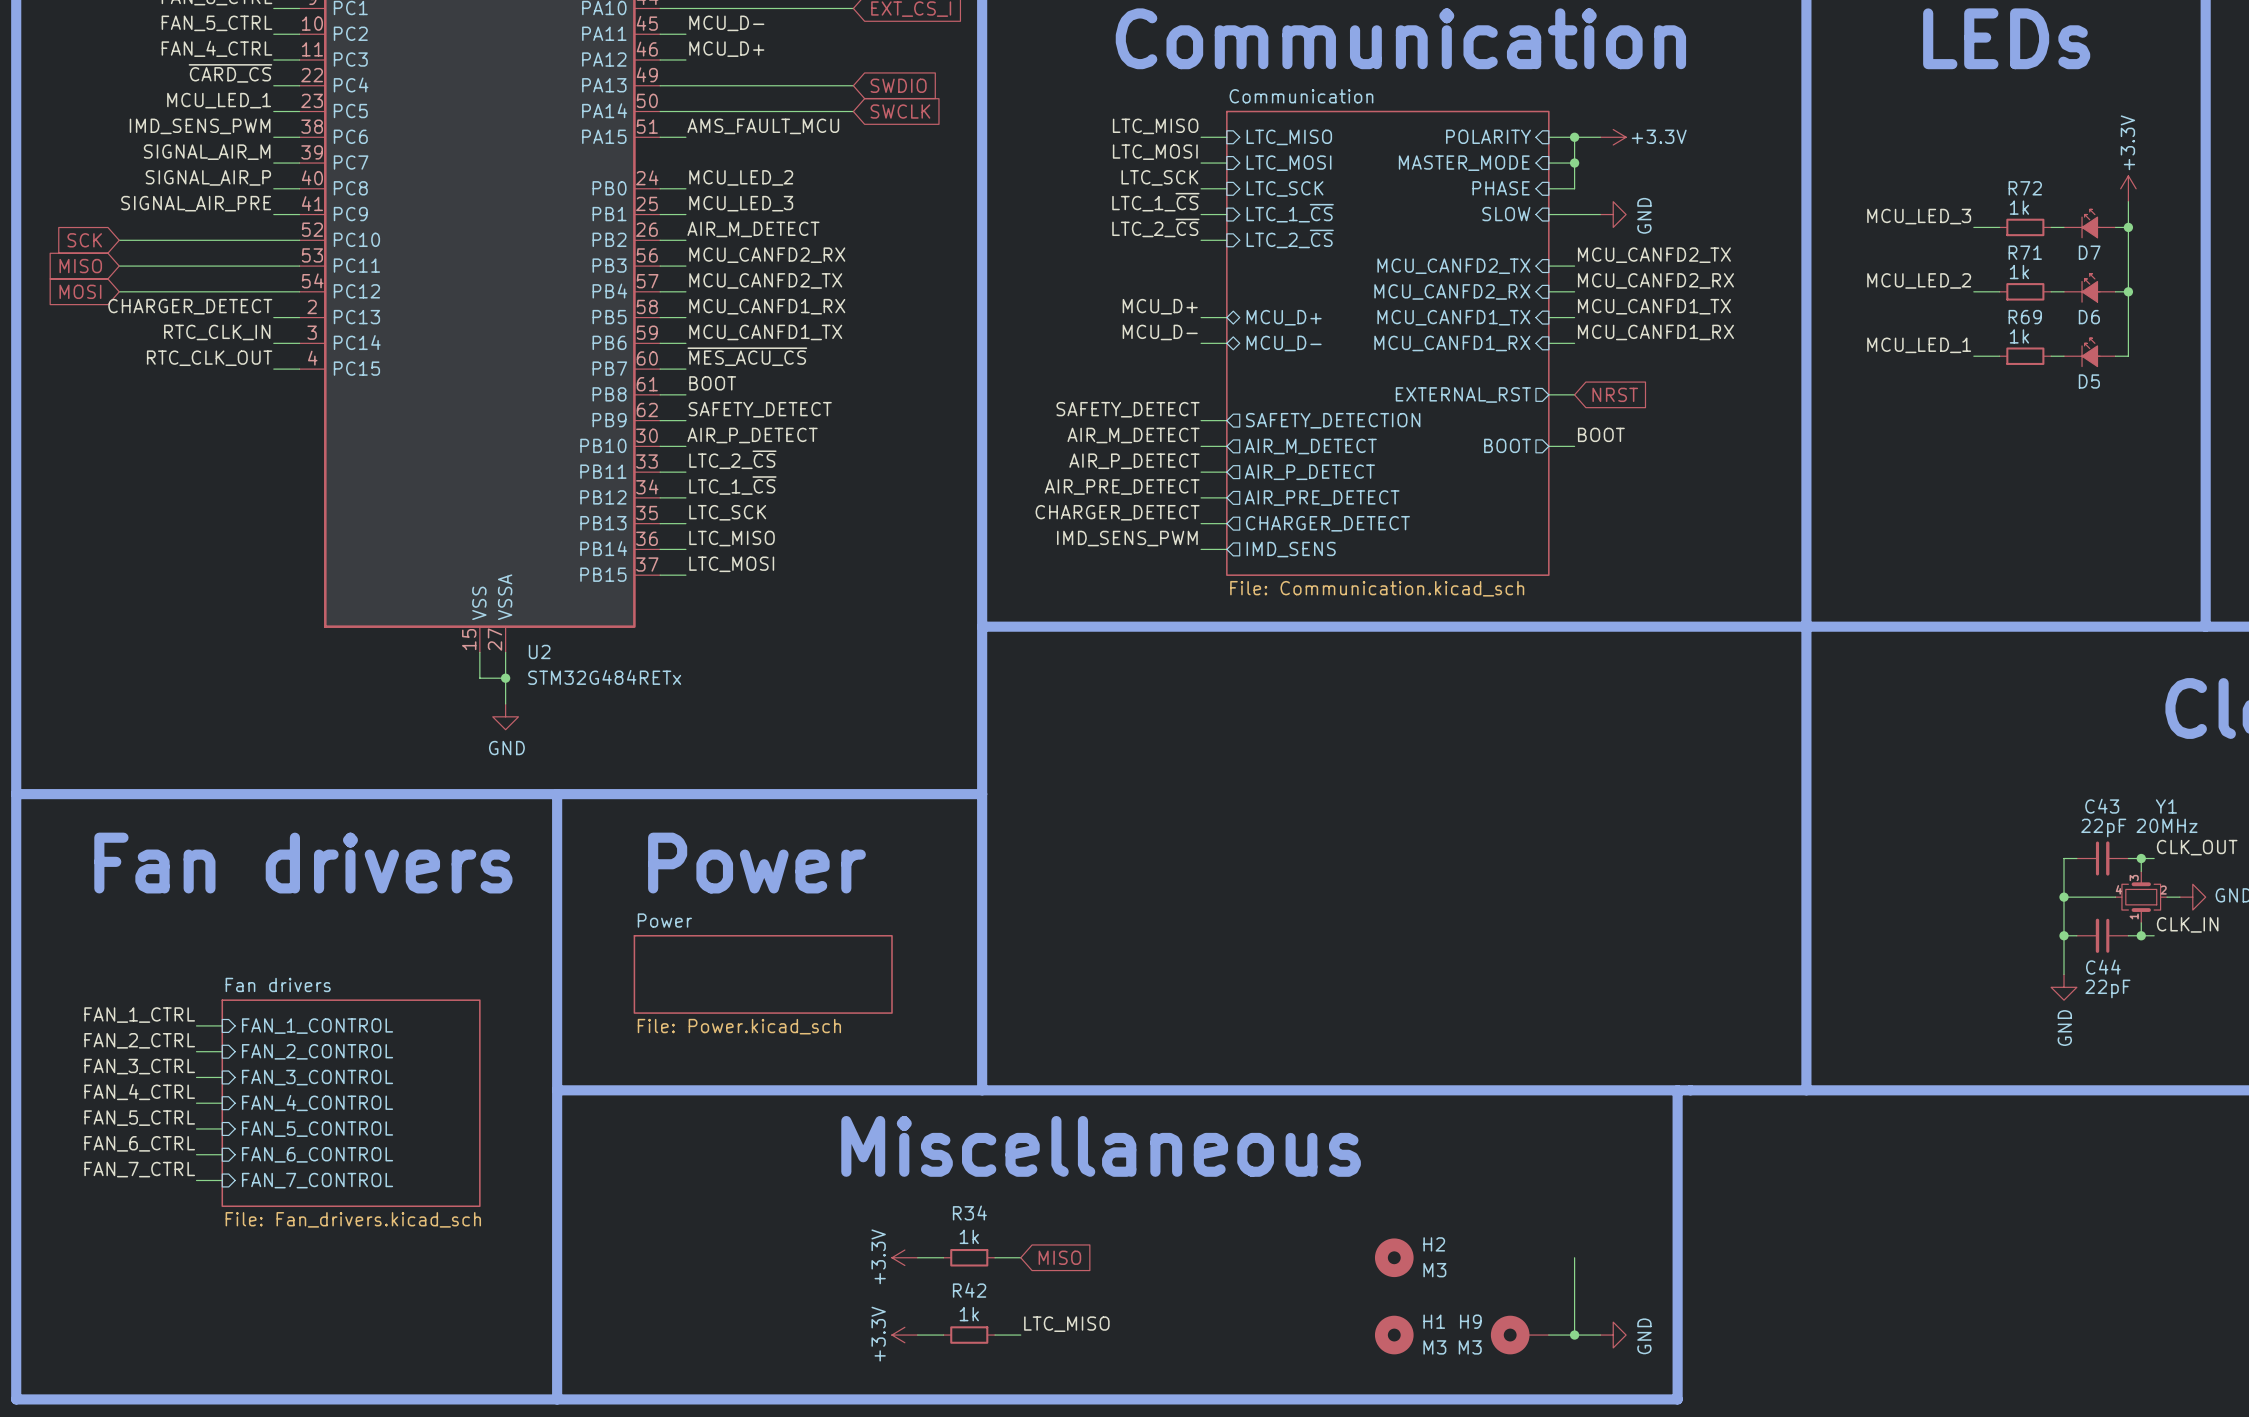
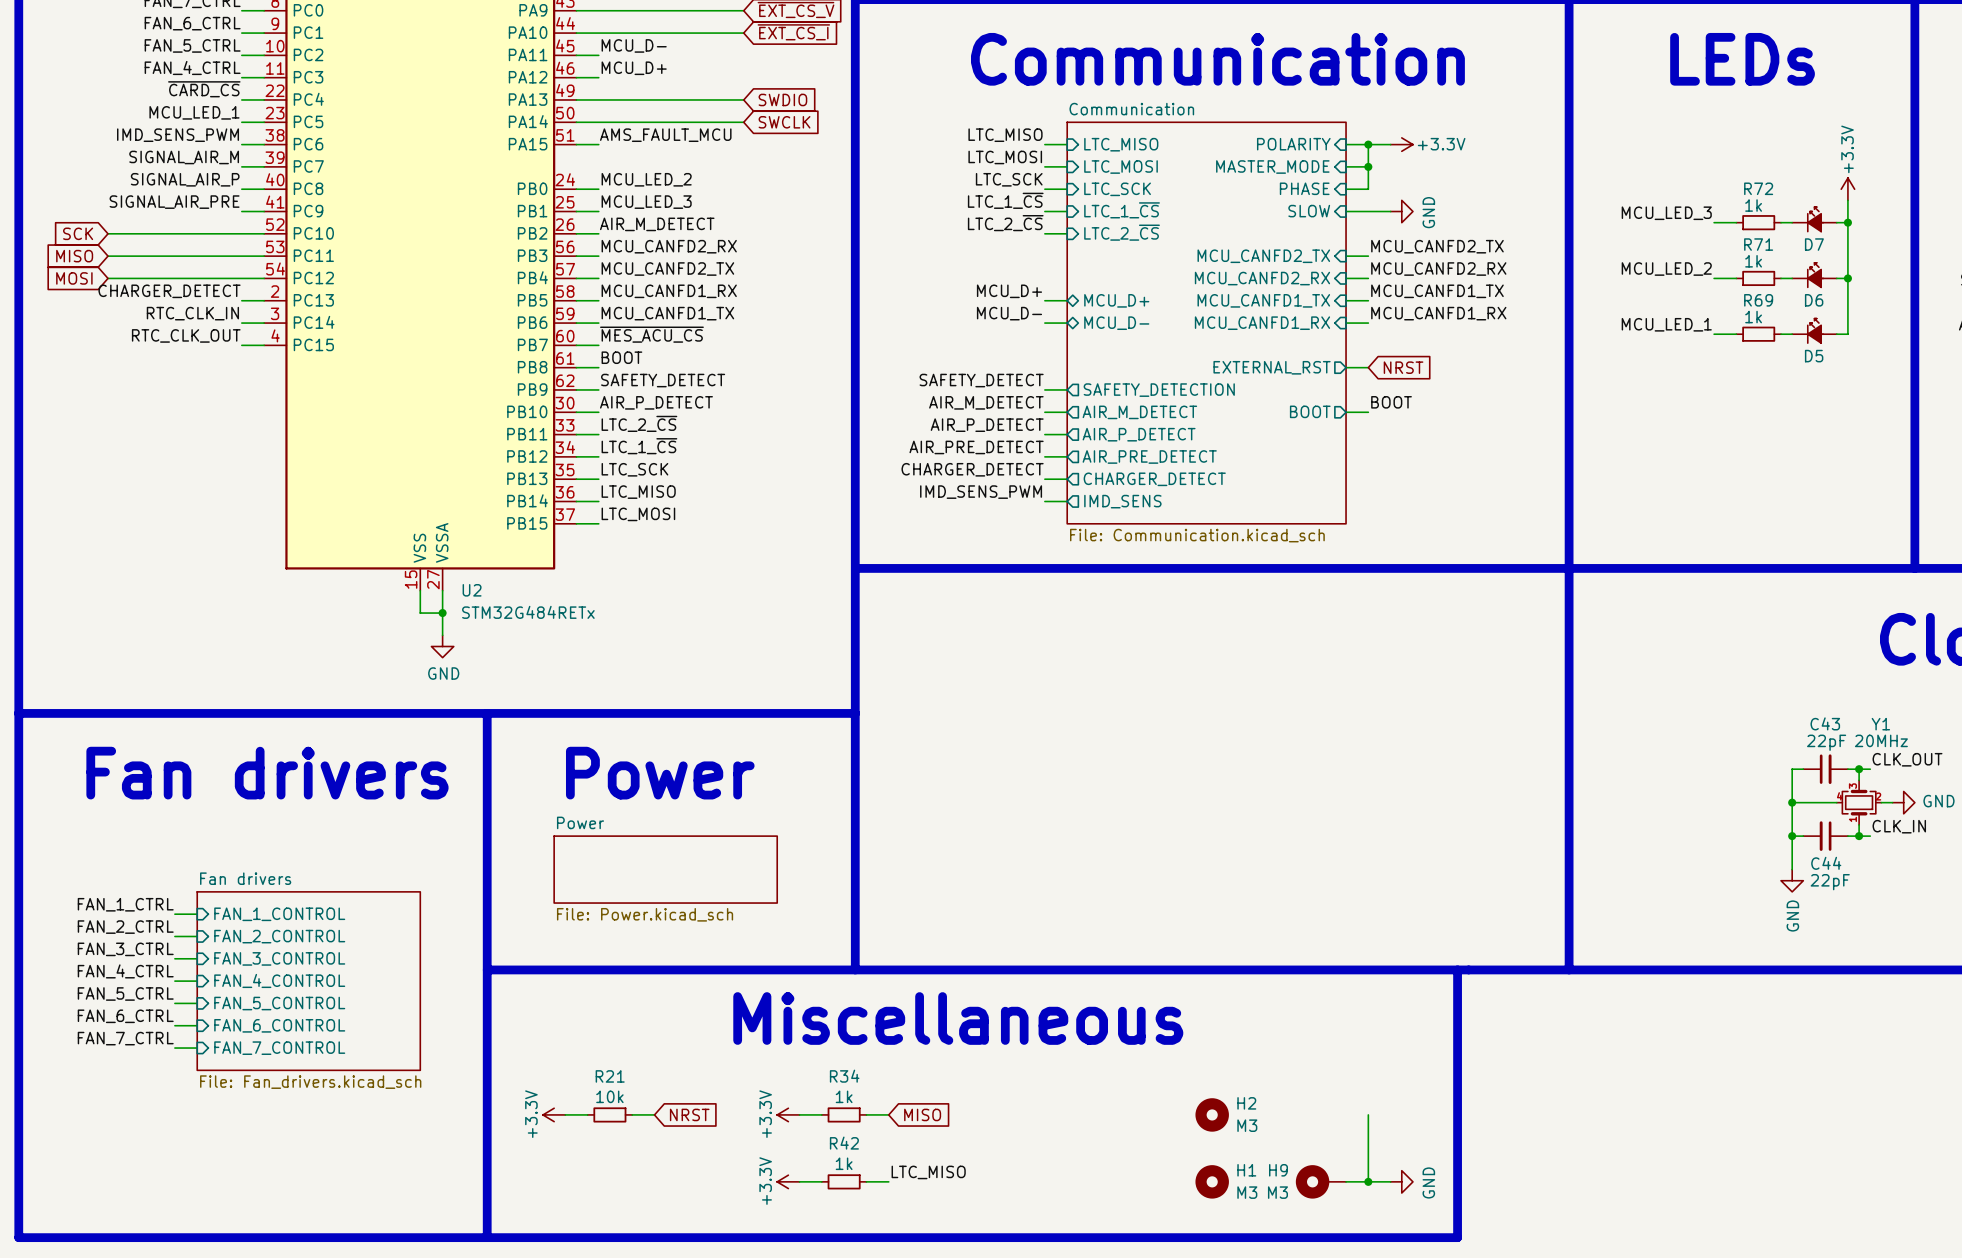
power symbol: none -> +3.3V (554, 1114)
wire: none -> (565, 1114) (587, 1114)
R21: none -> 10k (609, 1114)
wire: none -> (632, 1114) (654, 1114)
global label: none -> NRST (689, 1114)

